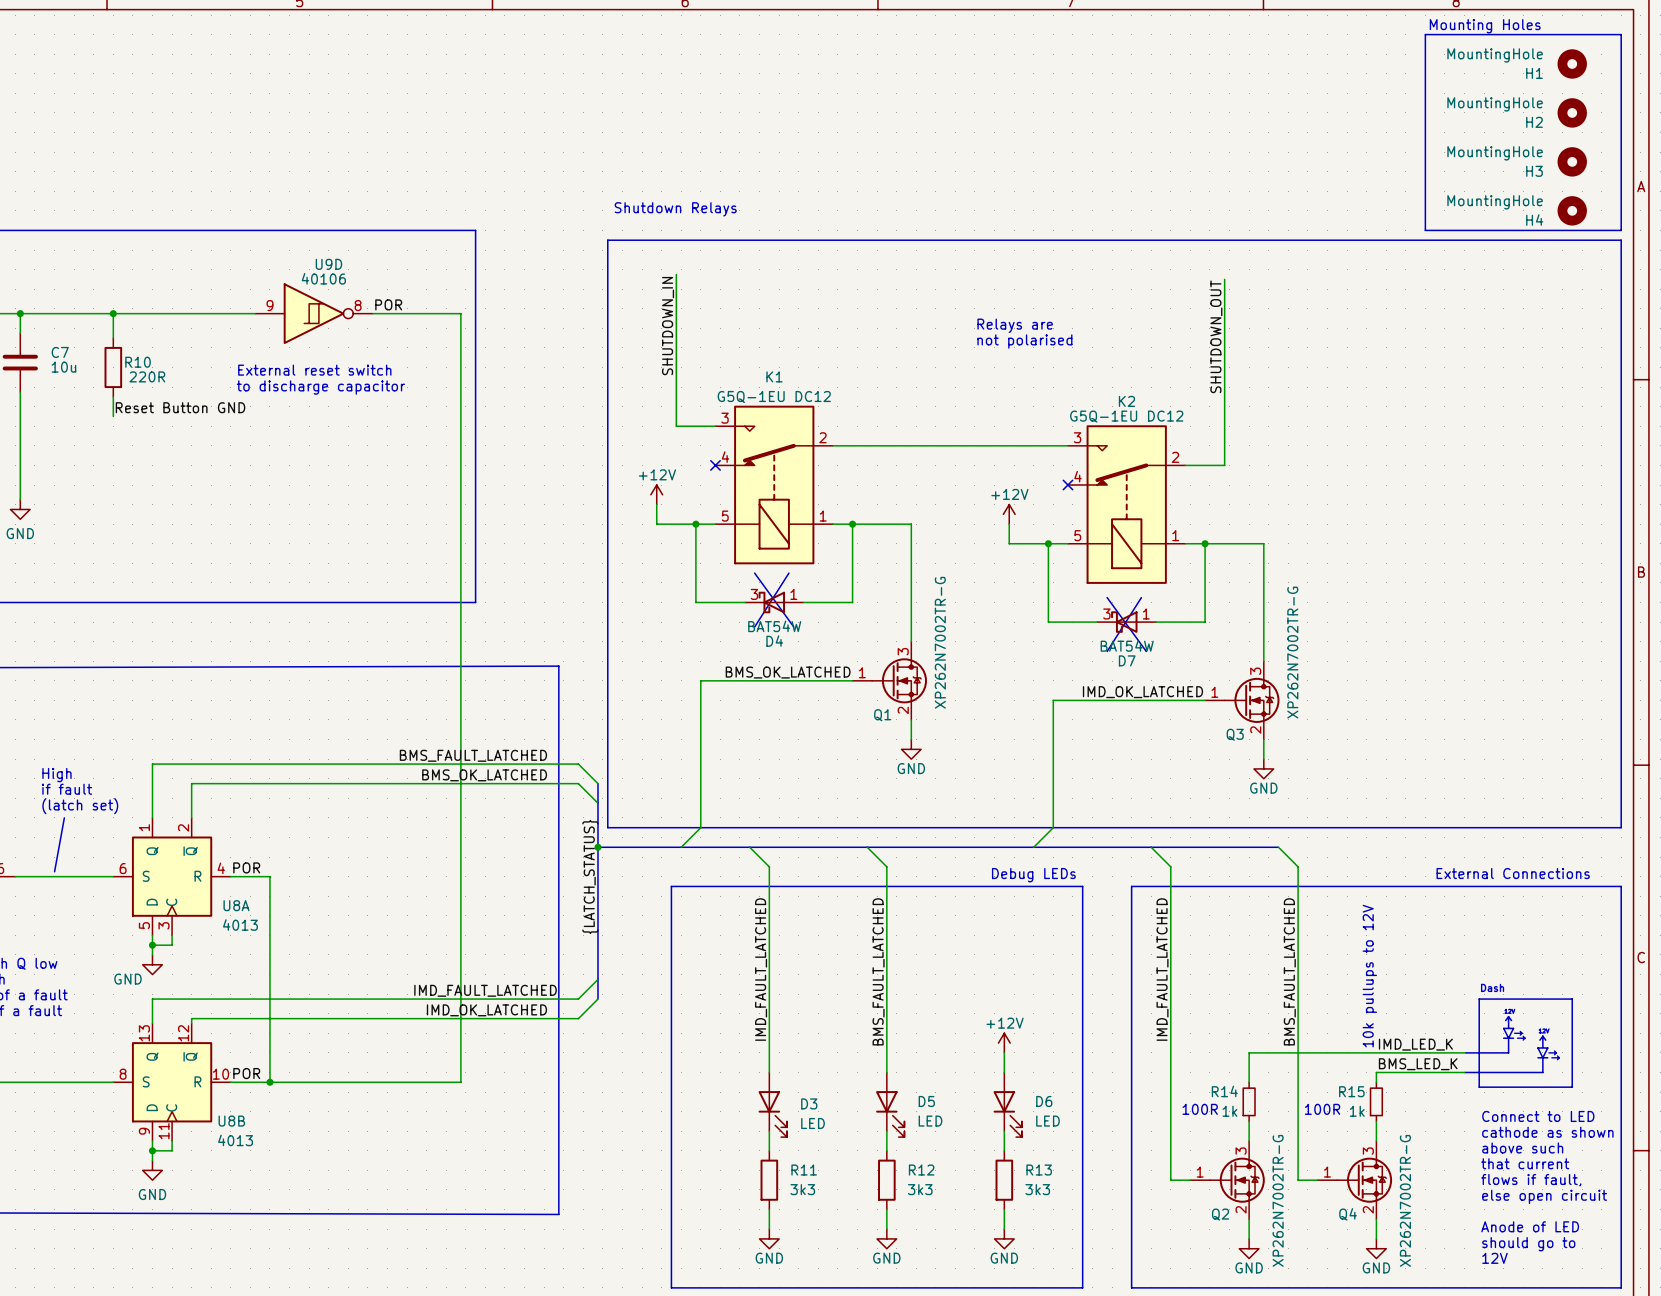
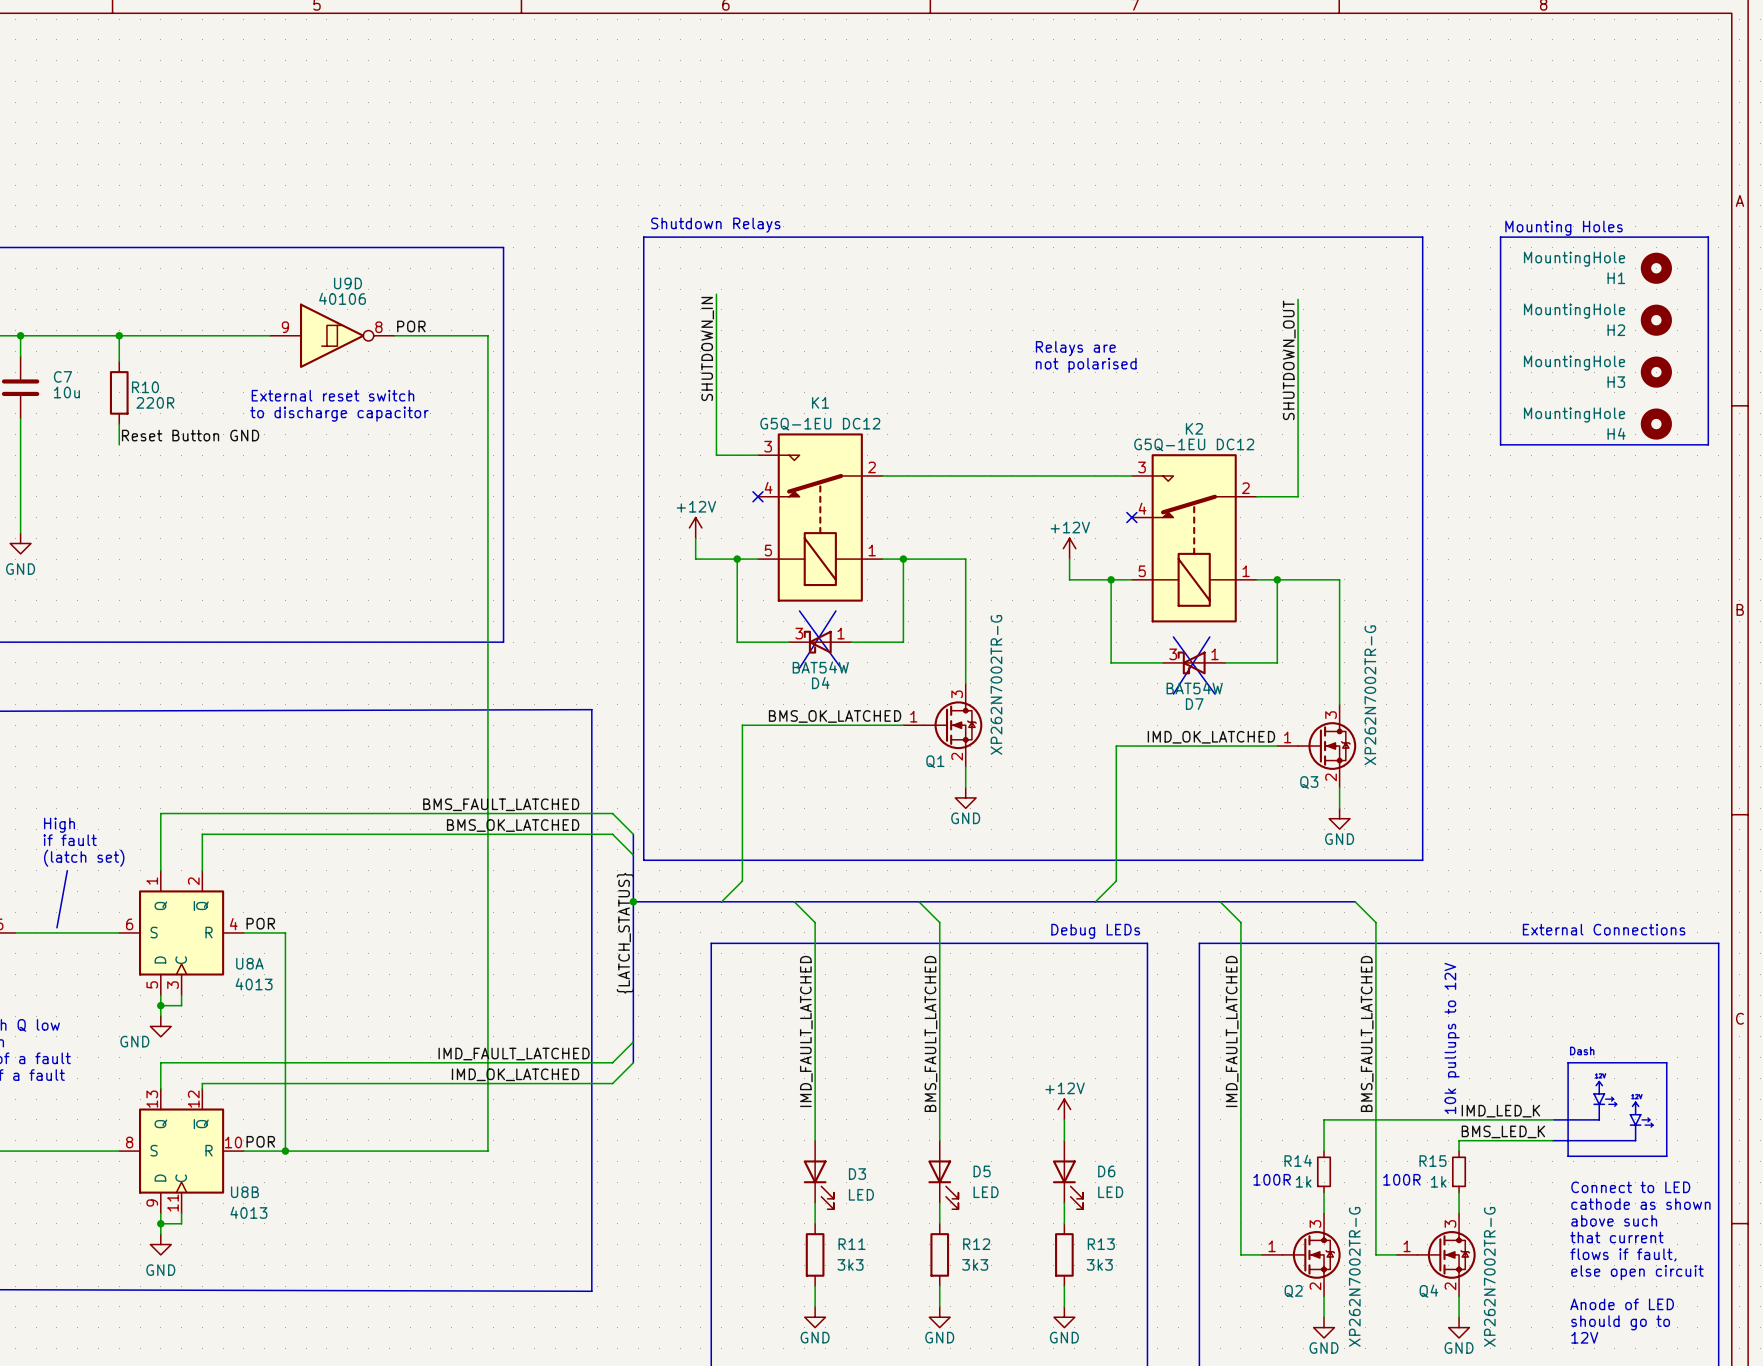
text position: Mounting Holes (1485, 26) -> Mounting Holes (1564, 228)
line: (1425, 34) (1425, 230) (1621, 230) (1621, 34) (1425, 34) -> (1500, 237) (1500, 444) (1708, 444) (1708, 237) (1500, 237)
H1 position: (1572, 63) -> (1656, 268)
H2 position: (1572, 112) -> (1656, 320)
H3 position: (1572, 161) -> (1656, 372)
H4 position: (1572, 210) -> (1656, 424)
line: (607, 240) (1621, 240) (1621, 827) (607, 827) (607, 808) -> (643, 257) (643, 237) (1422, 237) (1422, 860) (643, 860)

